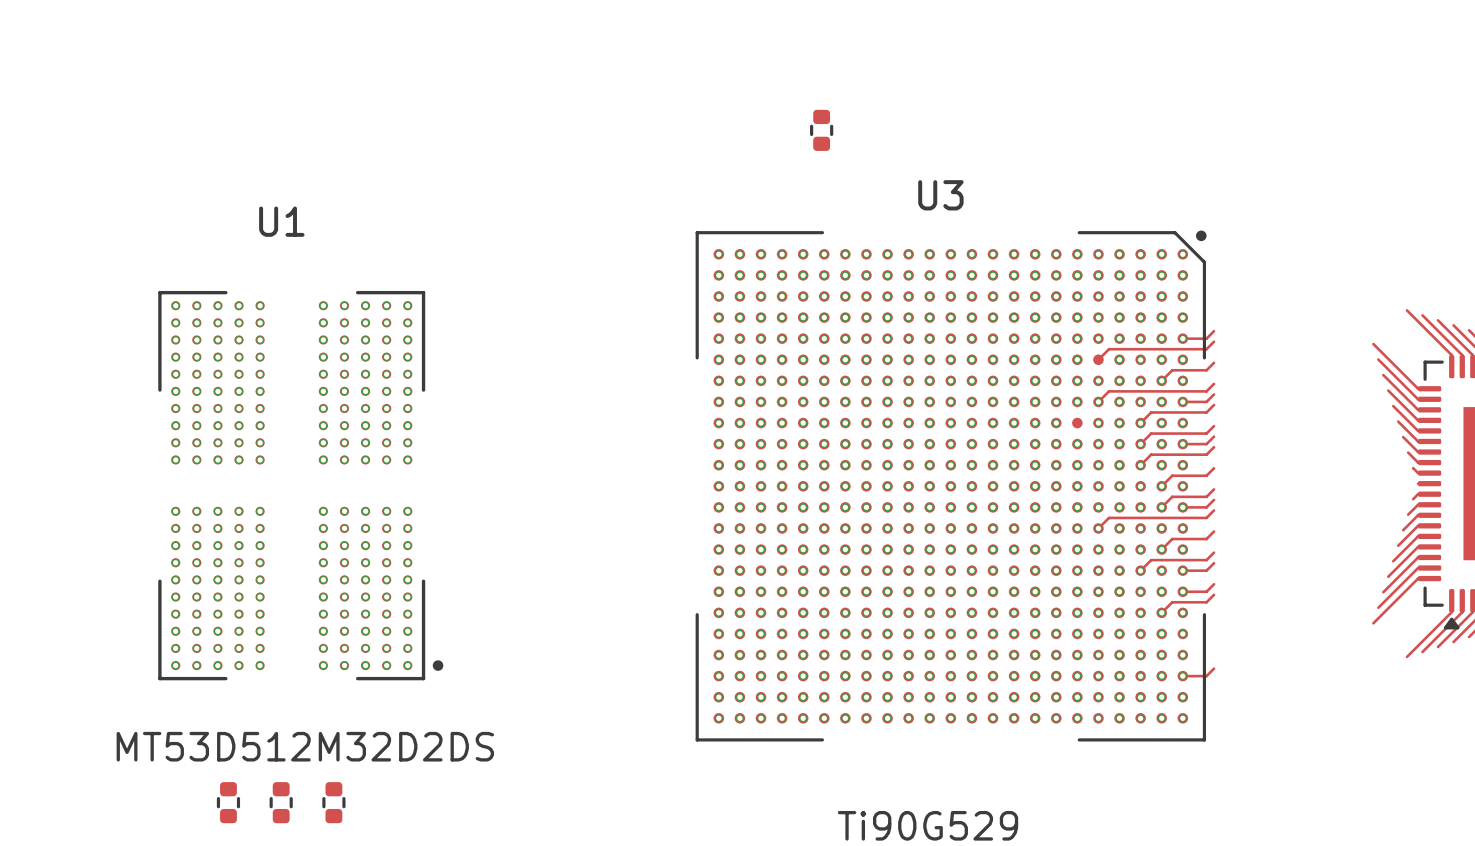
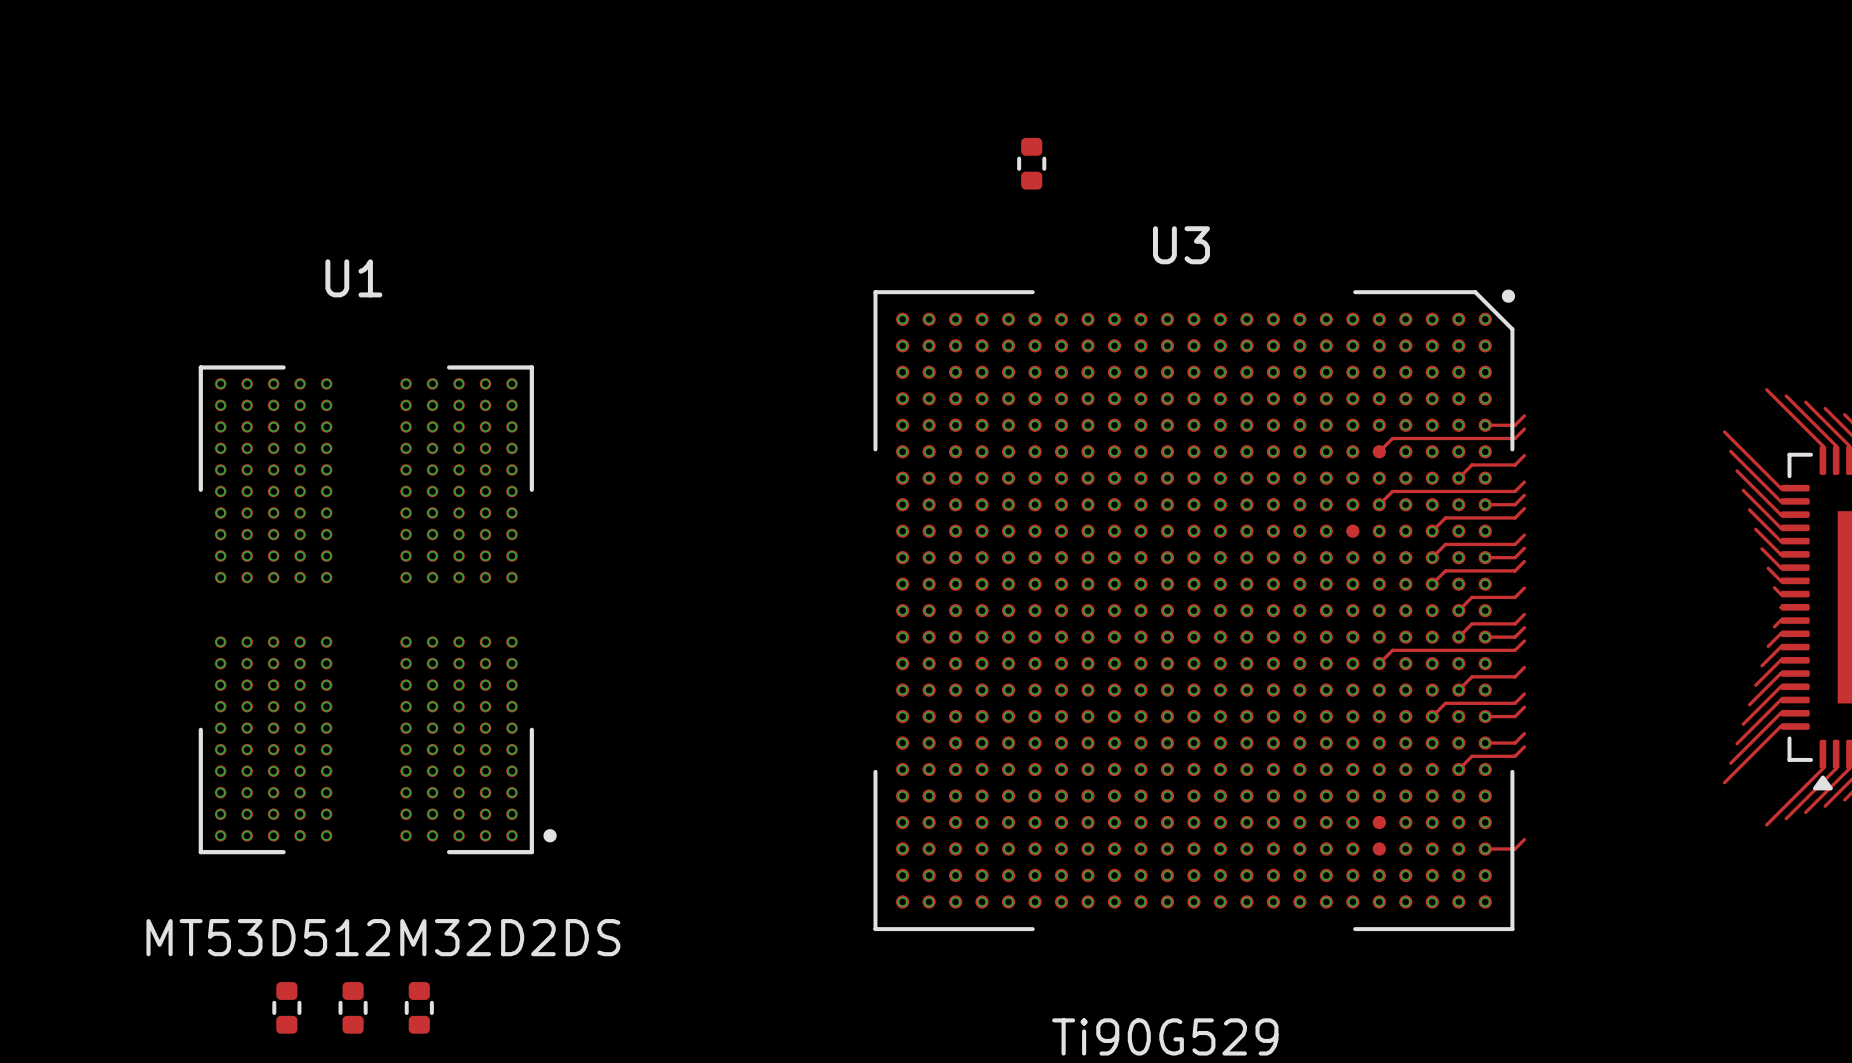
via: (1098, 655) -> none
via: (1098, 676) -> none

